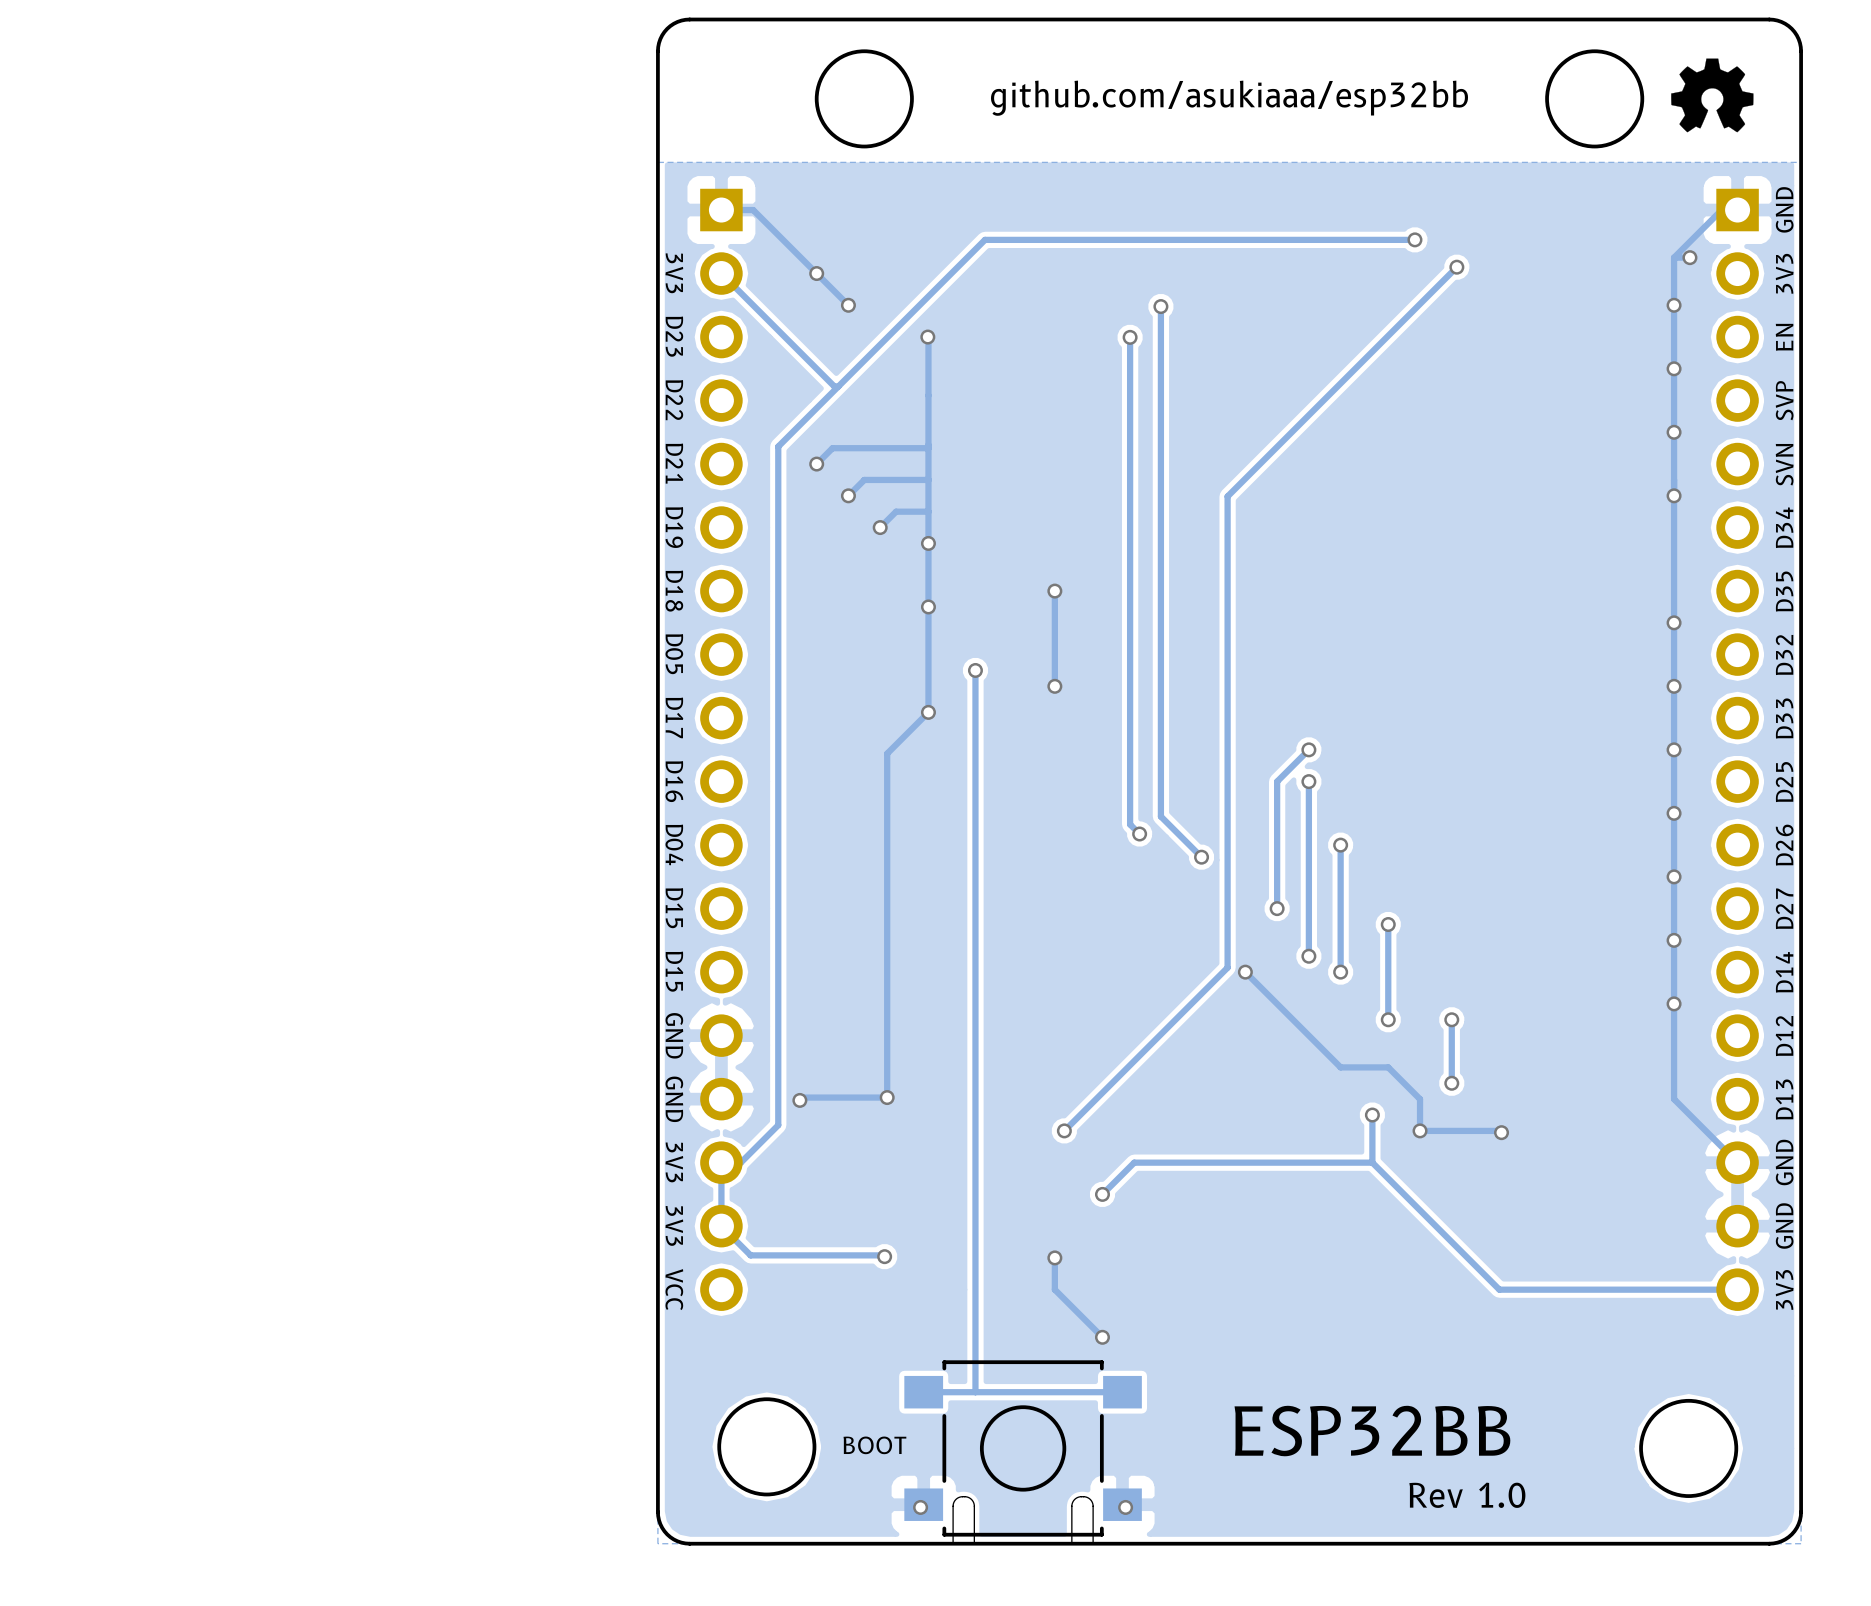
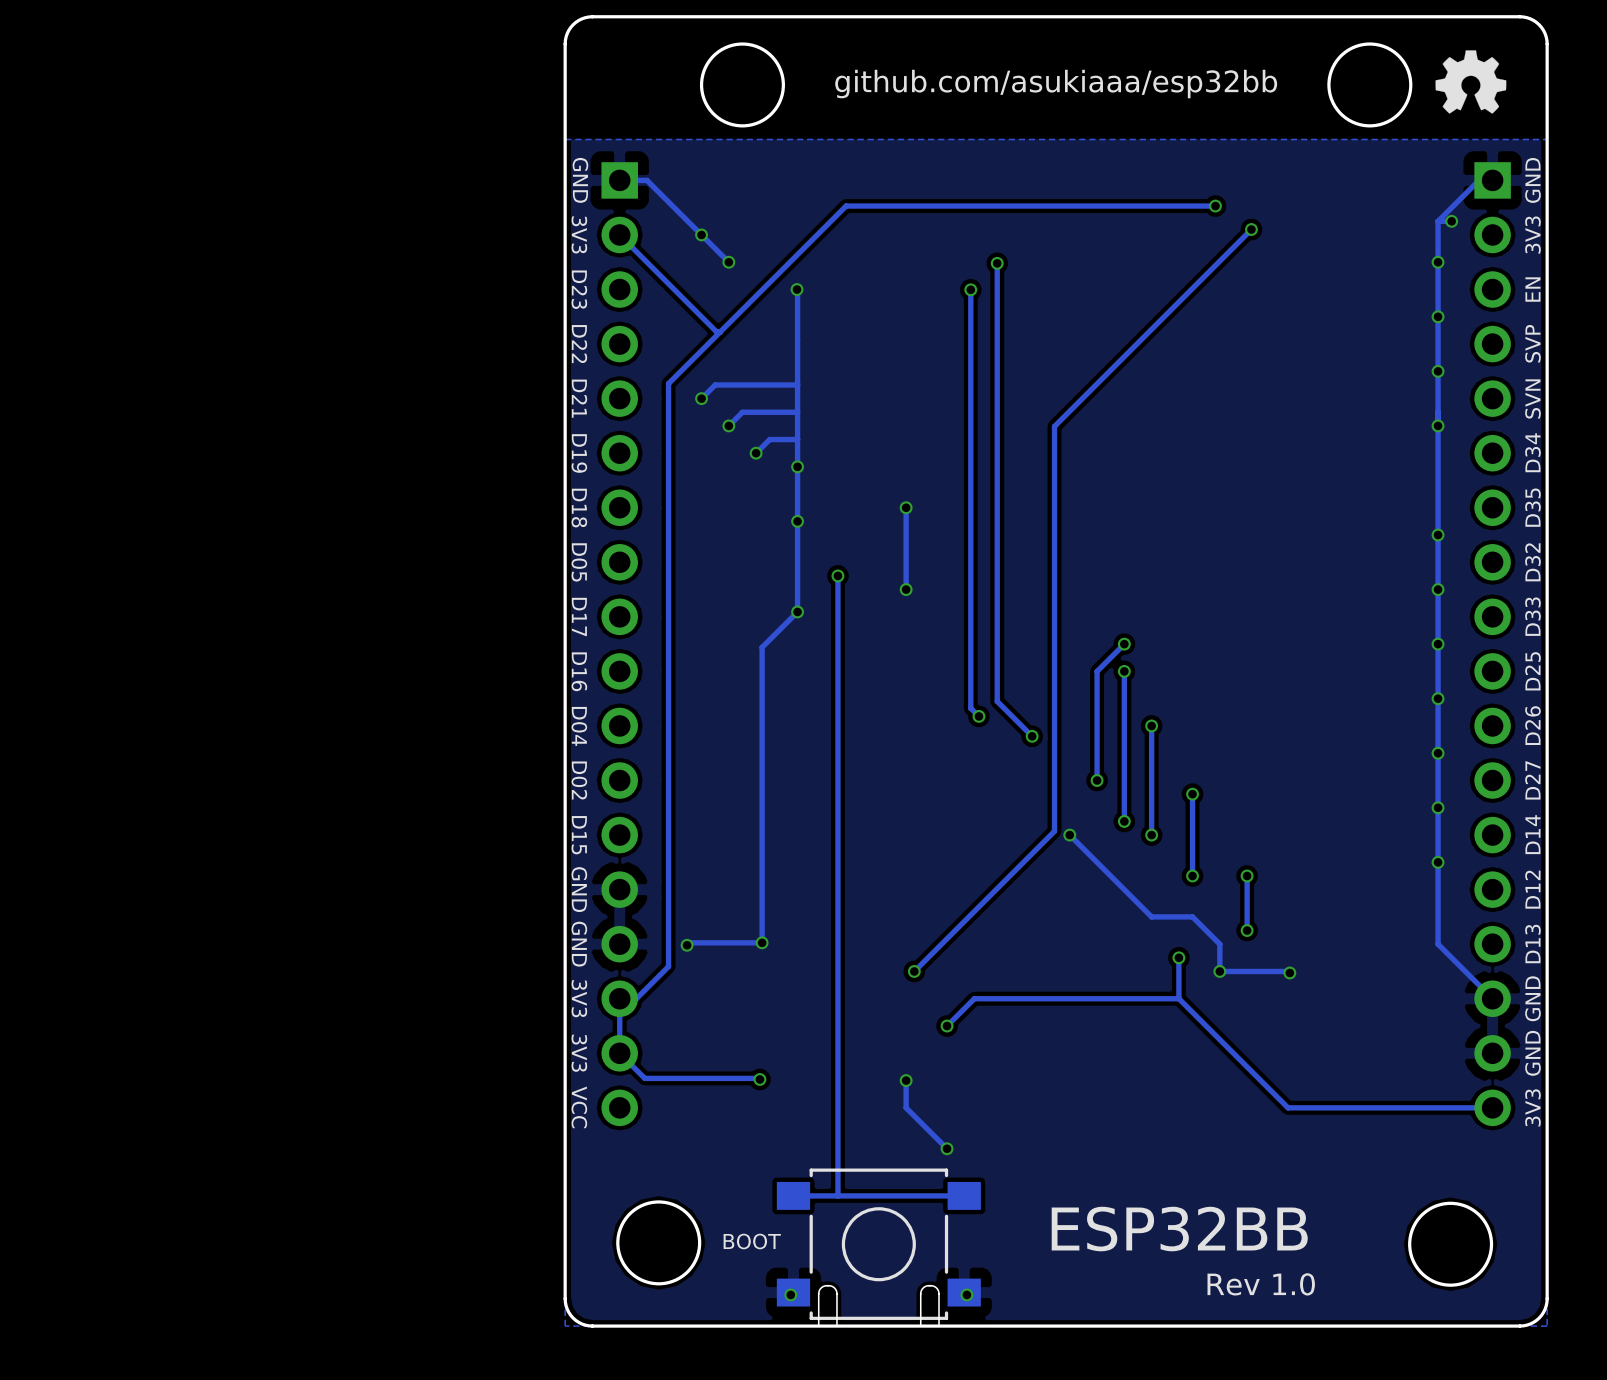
text: none -> GND (580, 180)
text: D15 (674, 908) -> D02 (579, 780)

